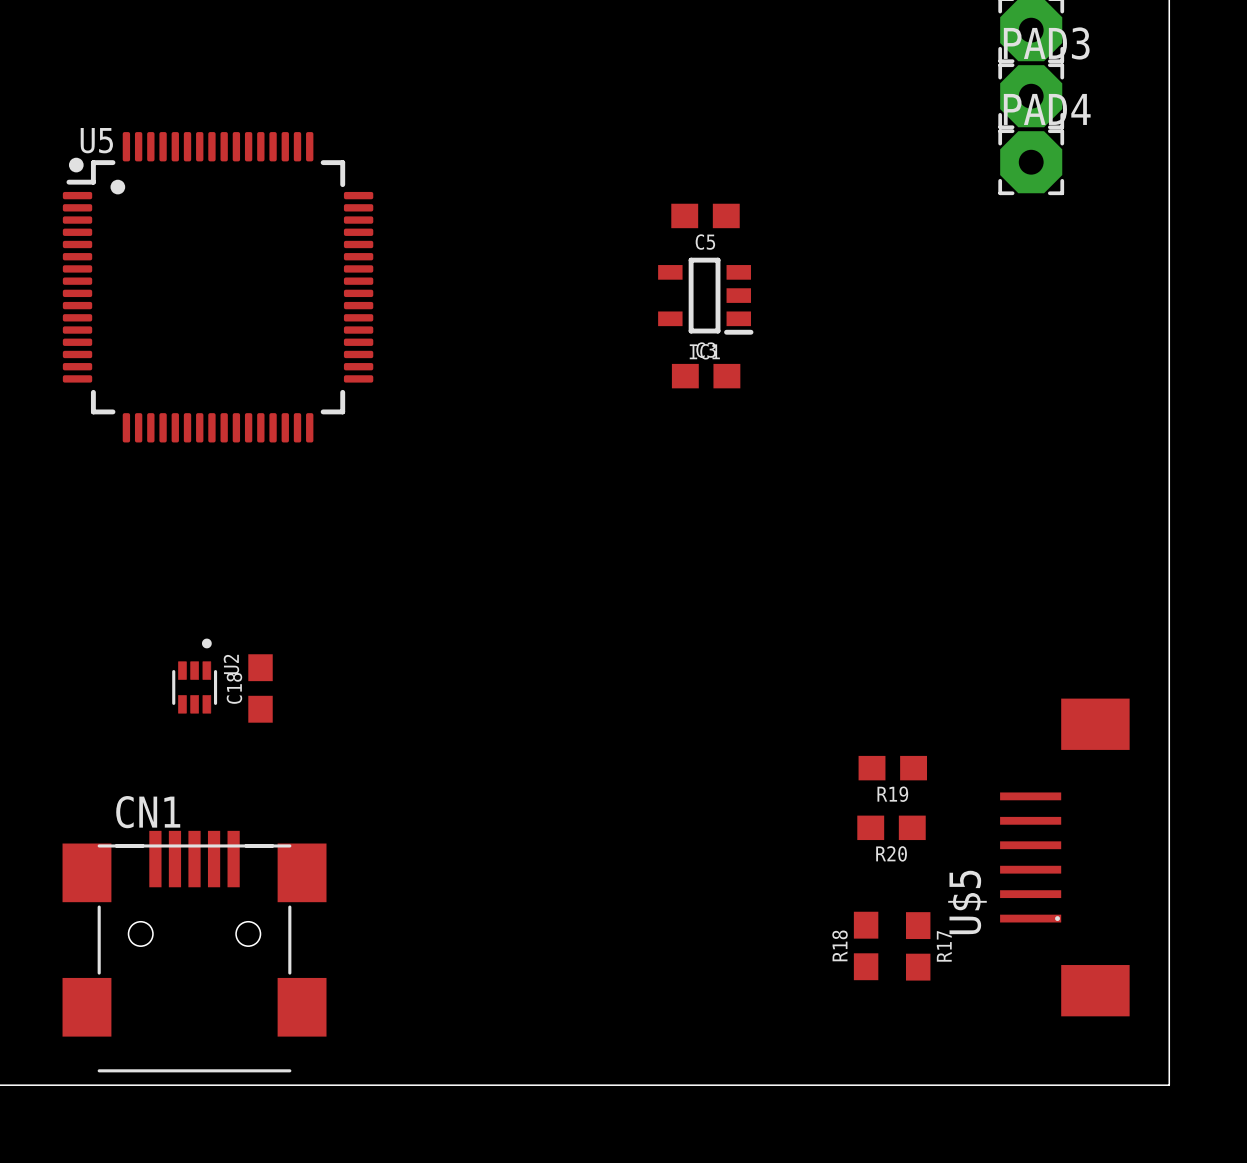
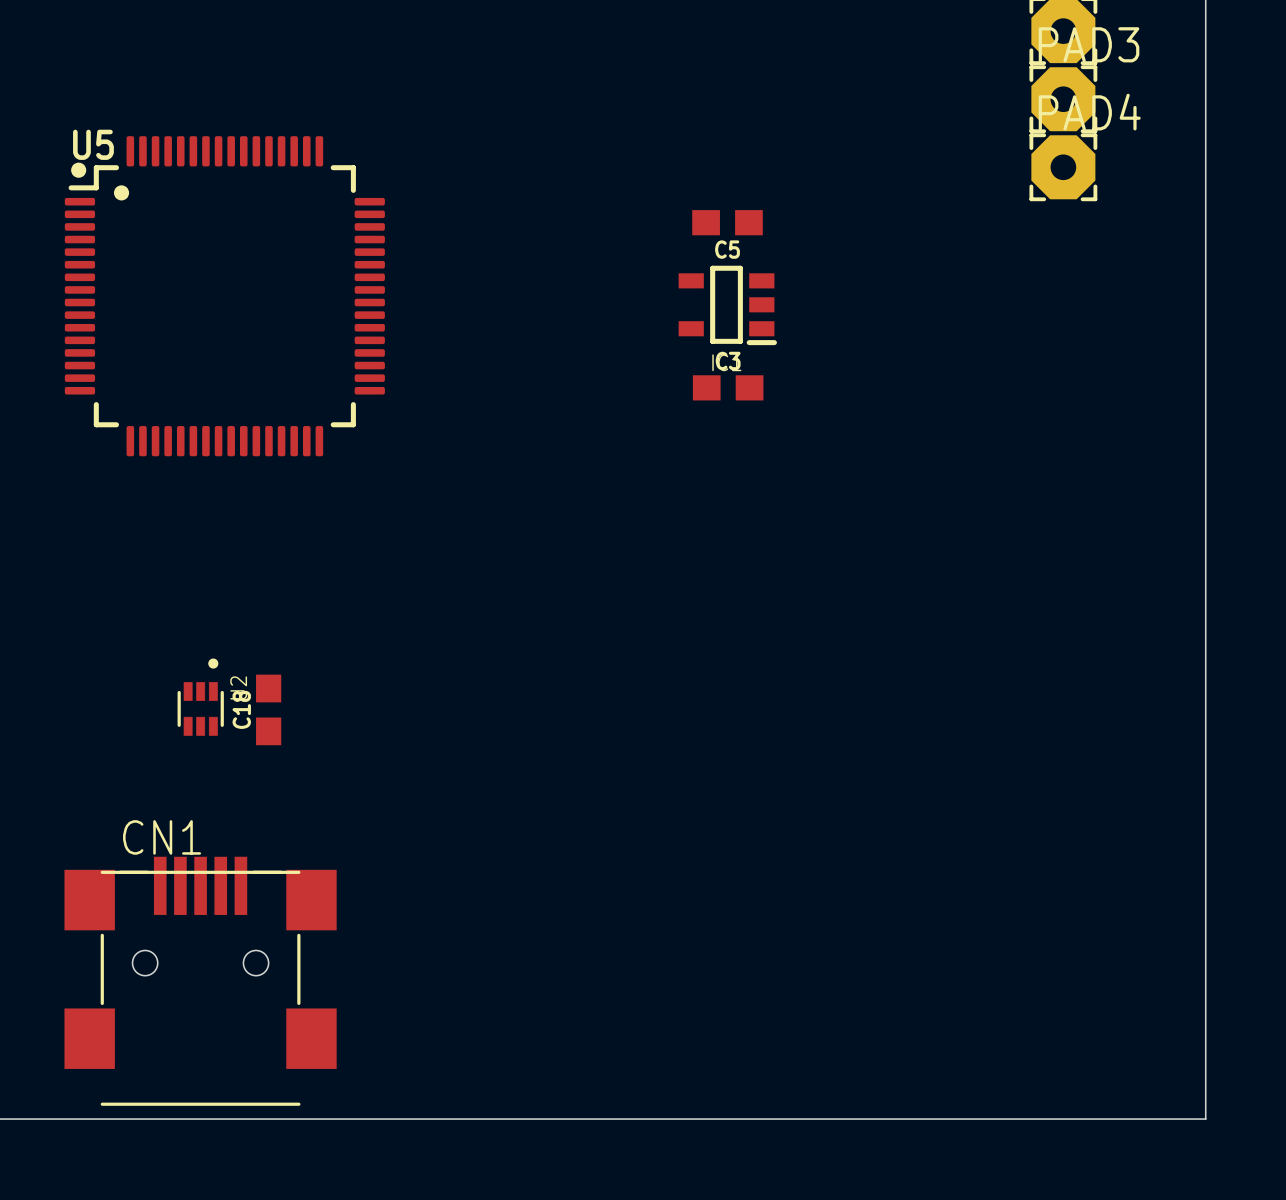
R19: (892, 768) -> none
R20: (891, 827) -> none
U$5: (1064, 857) -> none
R18: (866, 945) -> none
R17: (918, 946) -> none

